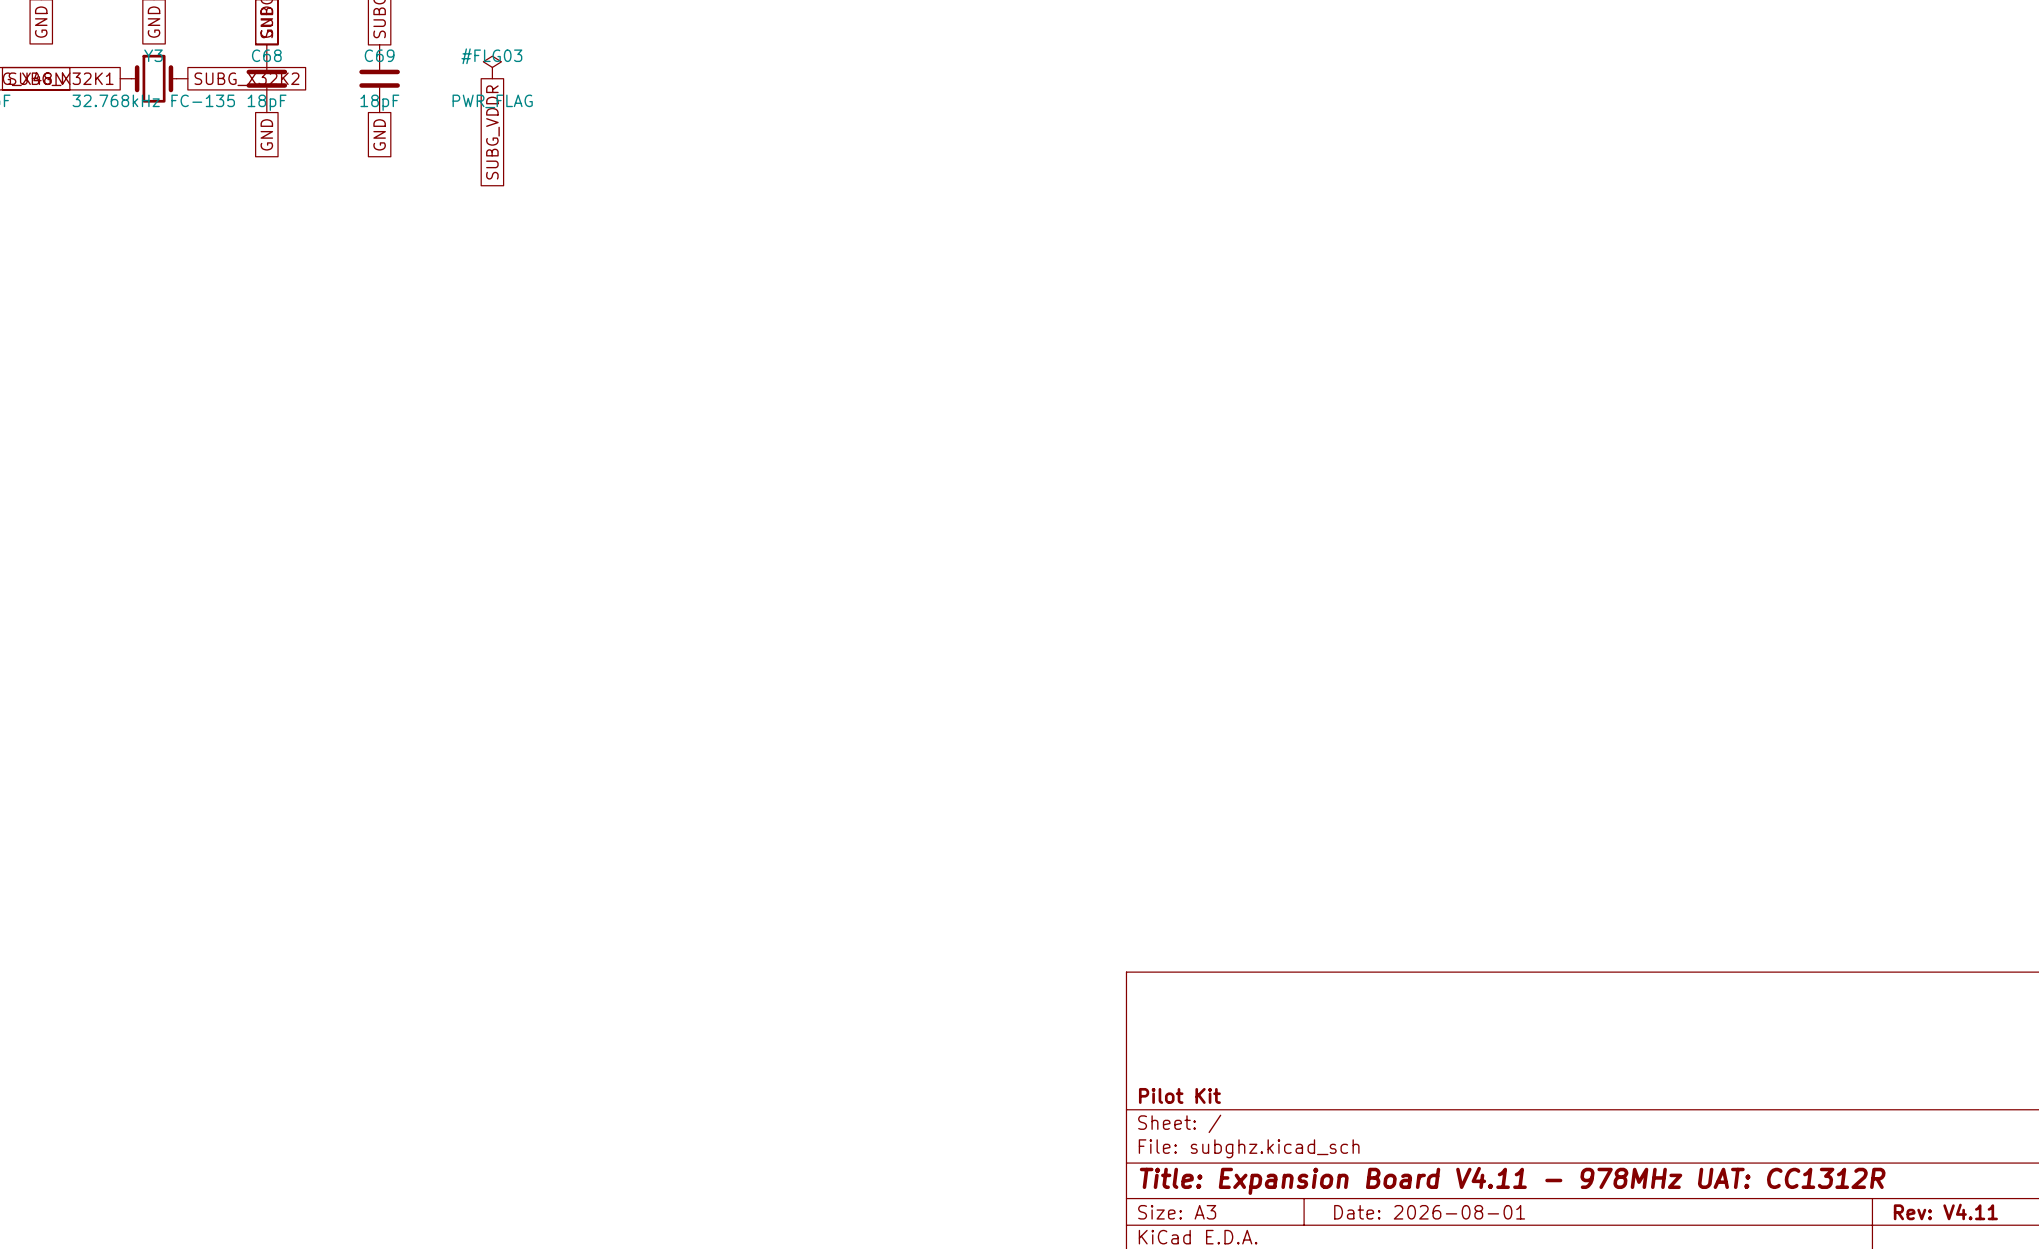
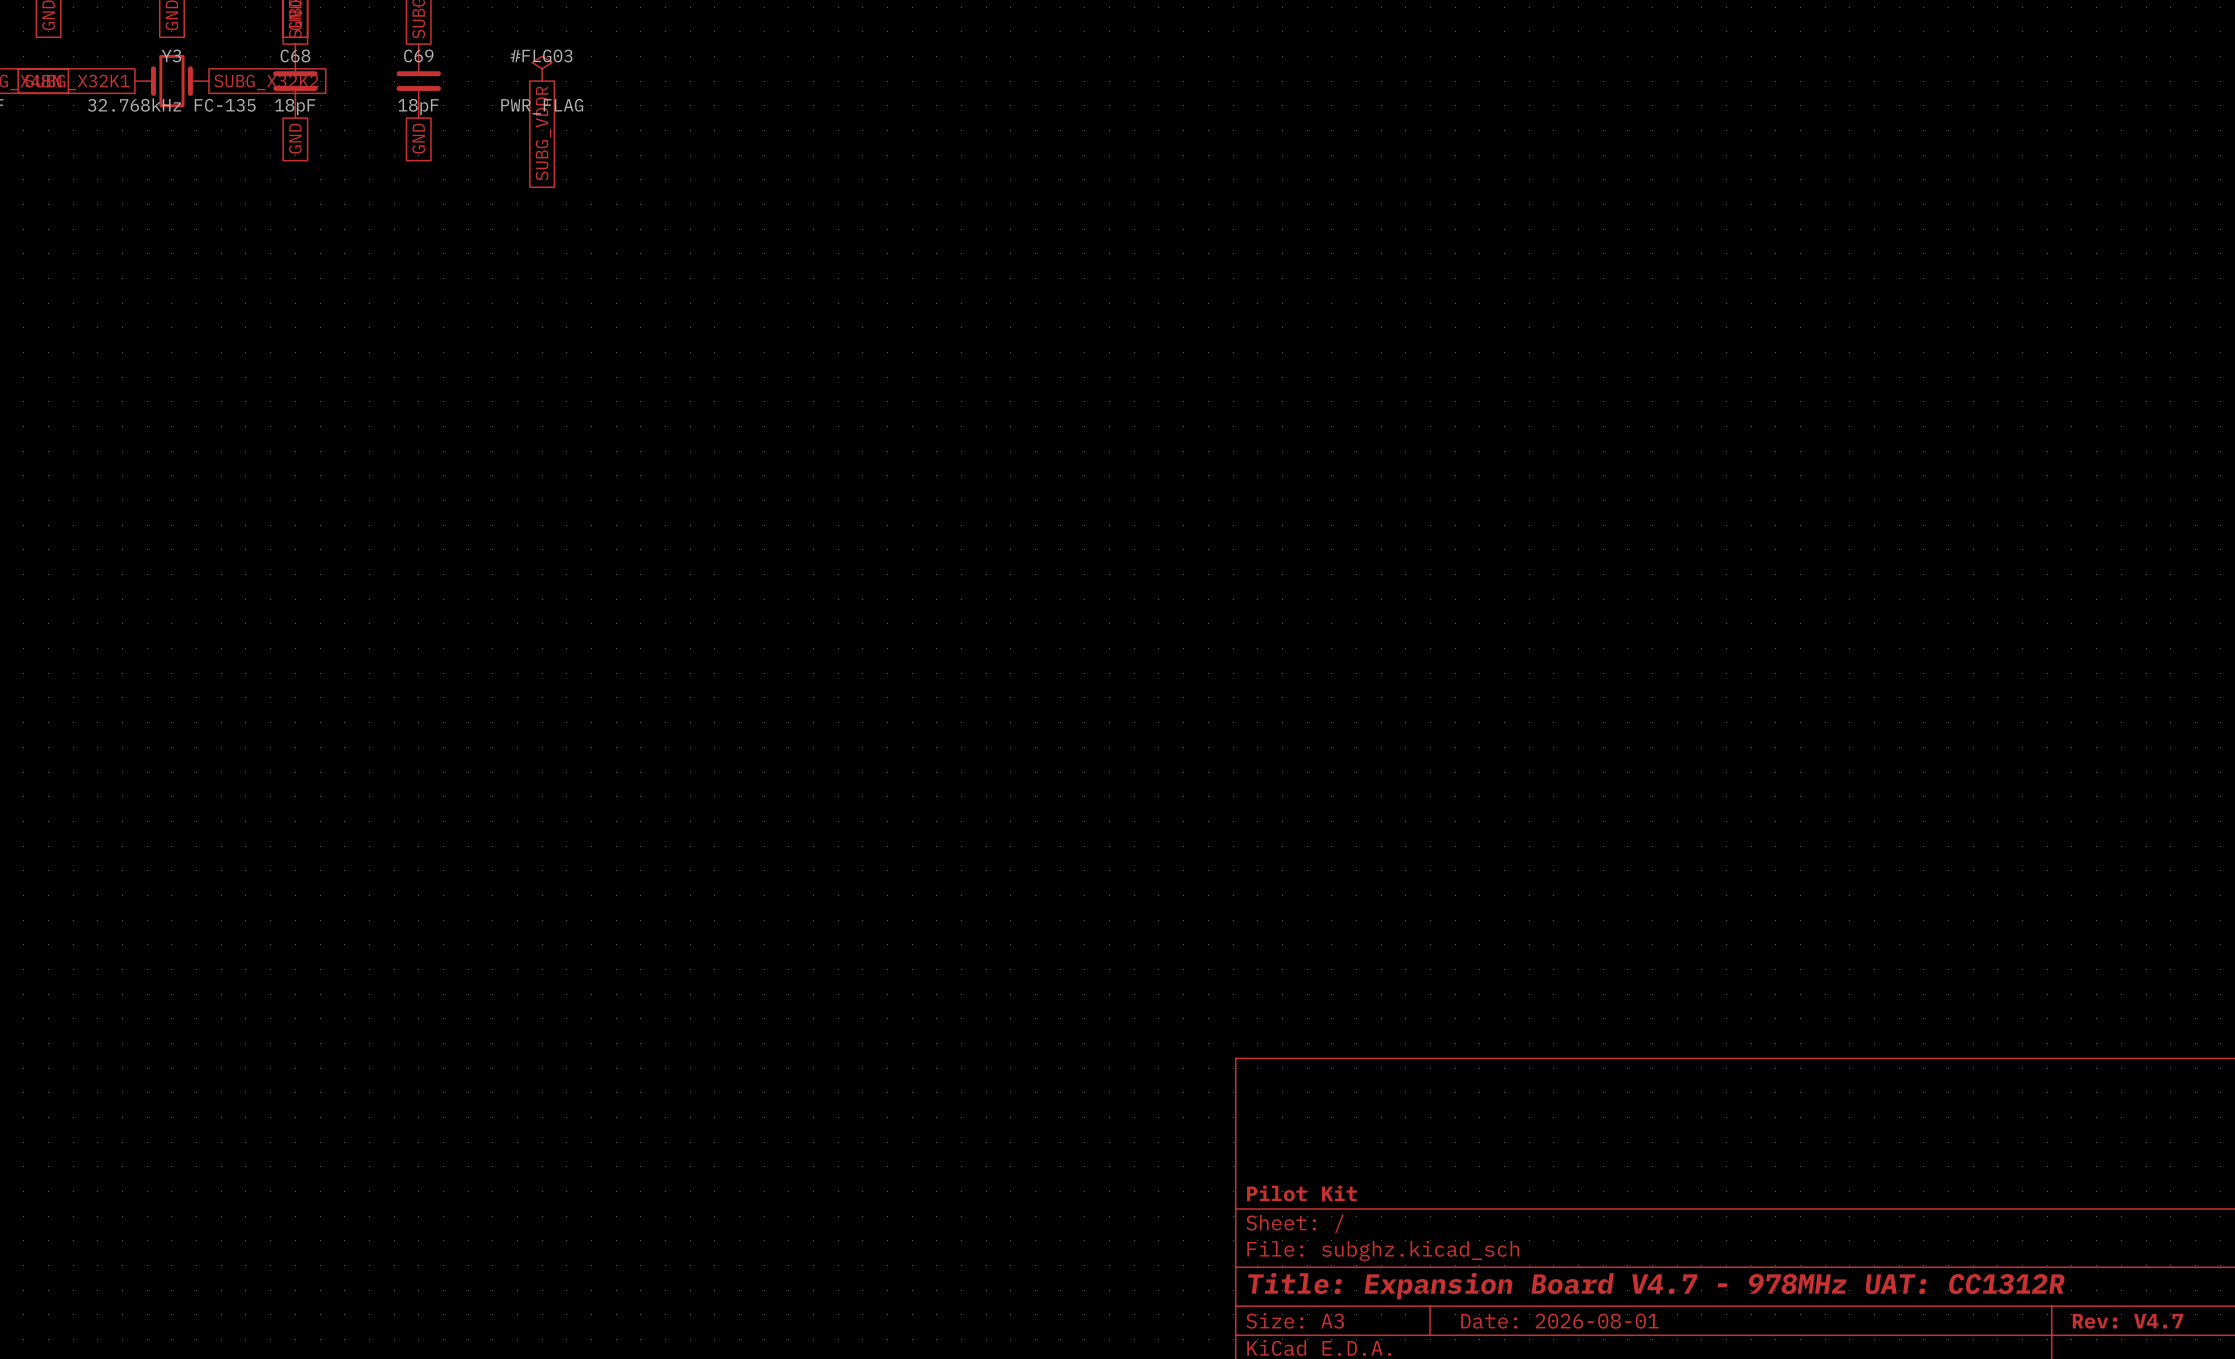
title block: Title: Expansion Board V4.11 - 978MHz UAT: CC1312R (1512, 1180) -> Title: Expansion Board V4.7 - 978MHz UAT: CC1312R (1656, 1286)
title block: Rev: V4.11 (1945, 1211) -> Rev: V4.7 (2127, 1321)

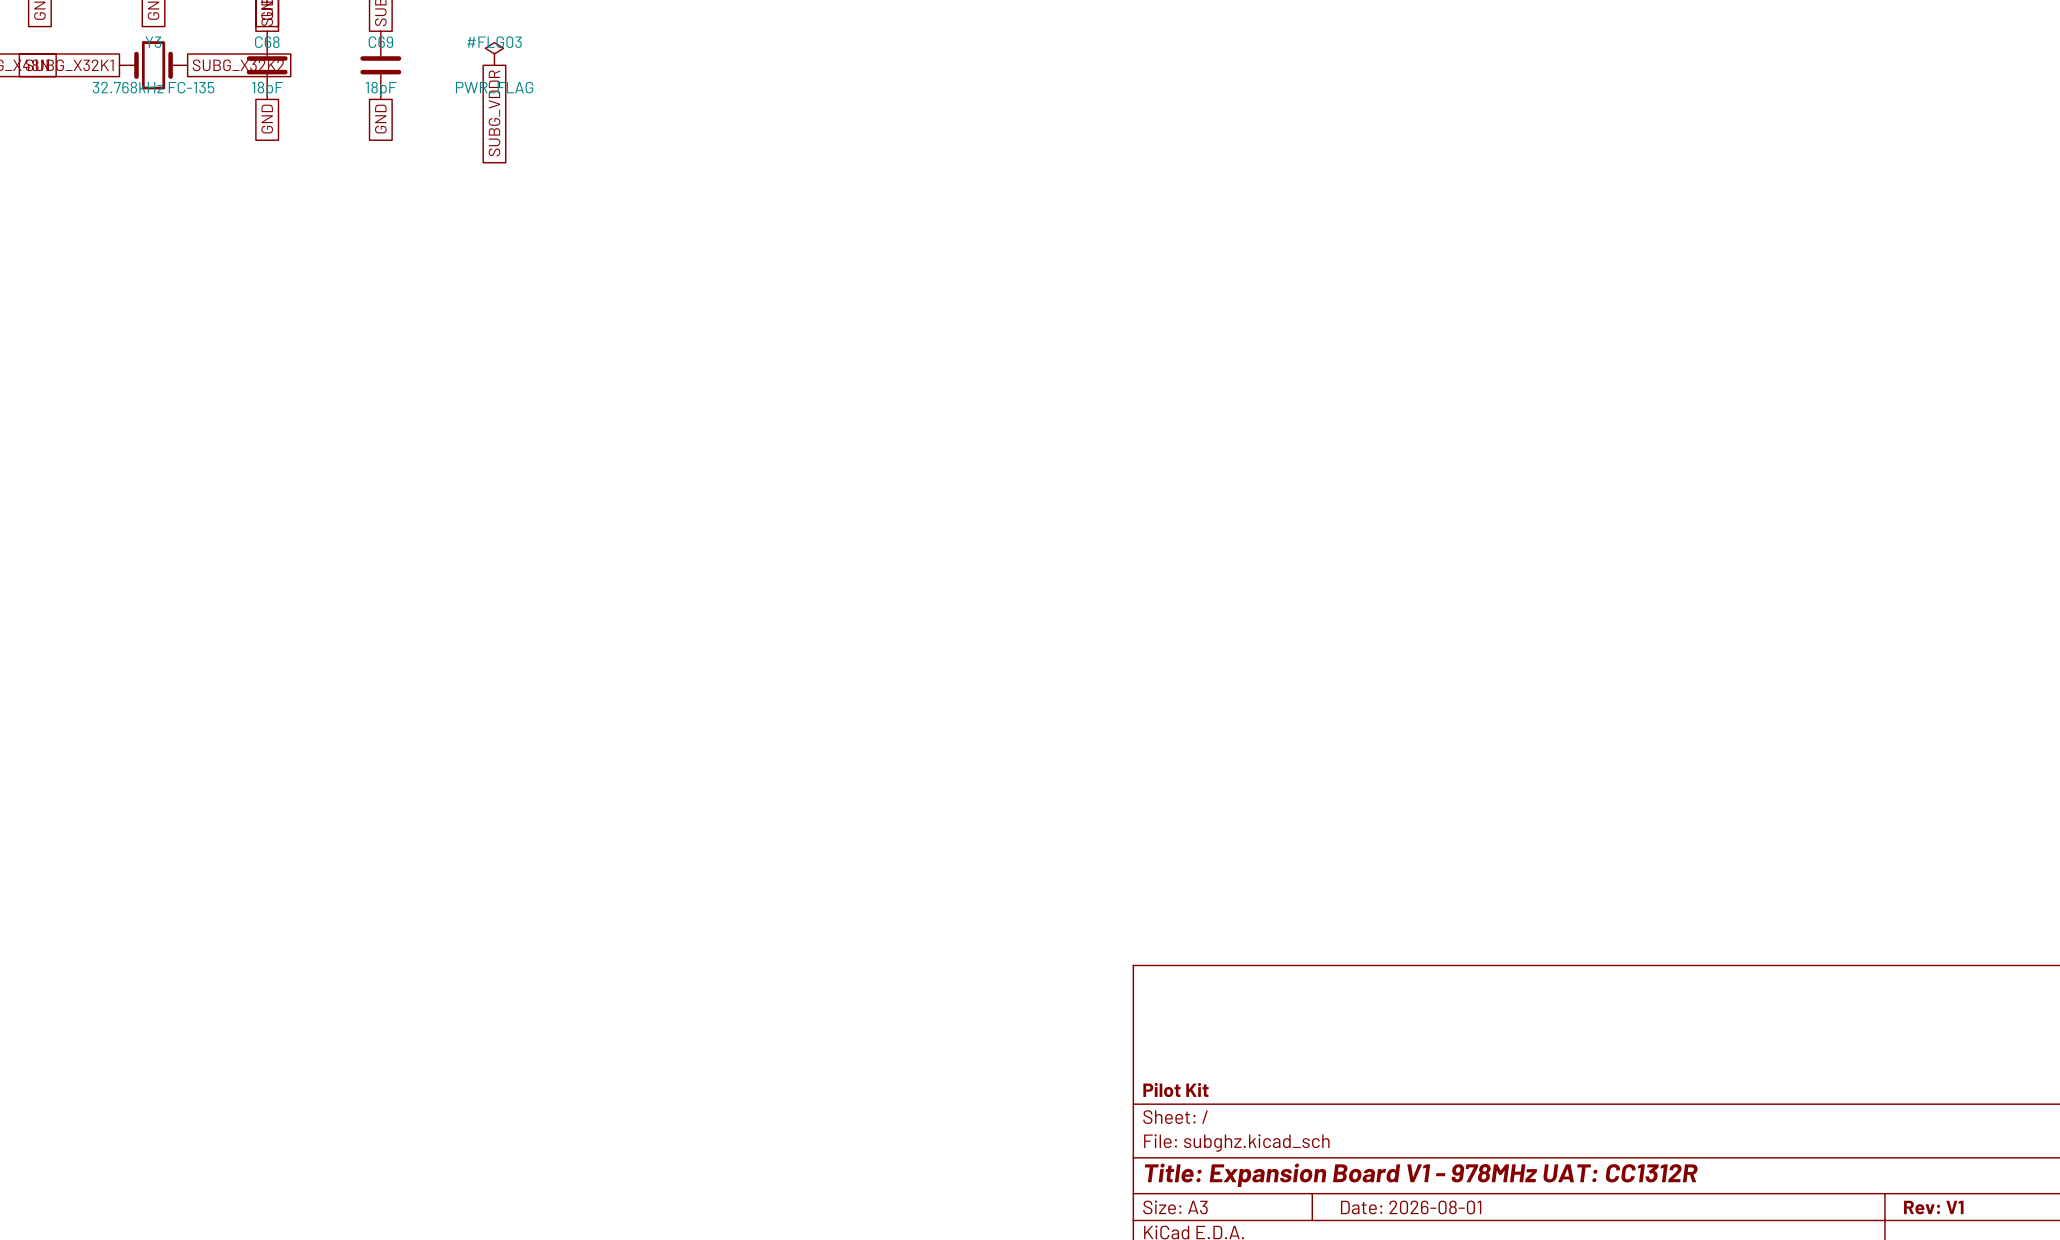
title block: Title: Expansion Board V4.7 - 978MHz UAT: CC1312R (1656, 1286) -> Title: Expansion Board V1 - 978MHz UAT: CC1312R (1421, 1175)
title block: Rev: V4.7 (2127, 1321) -> Rev: V1 (1933, 1207)

